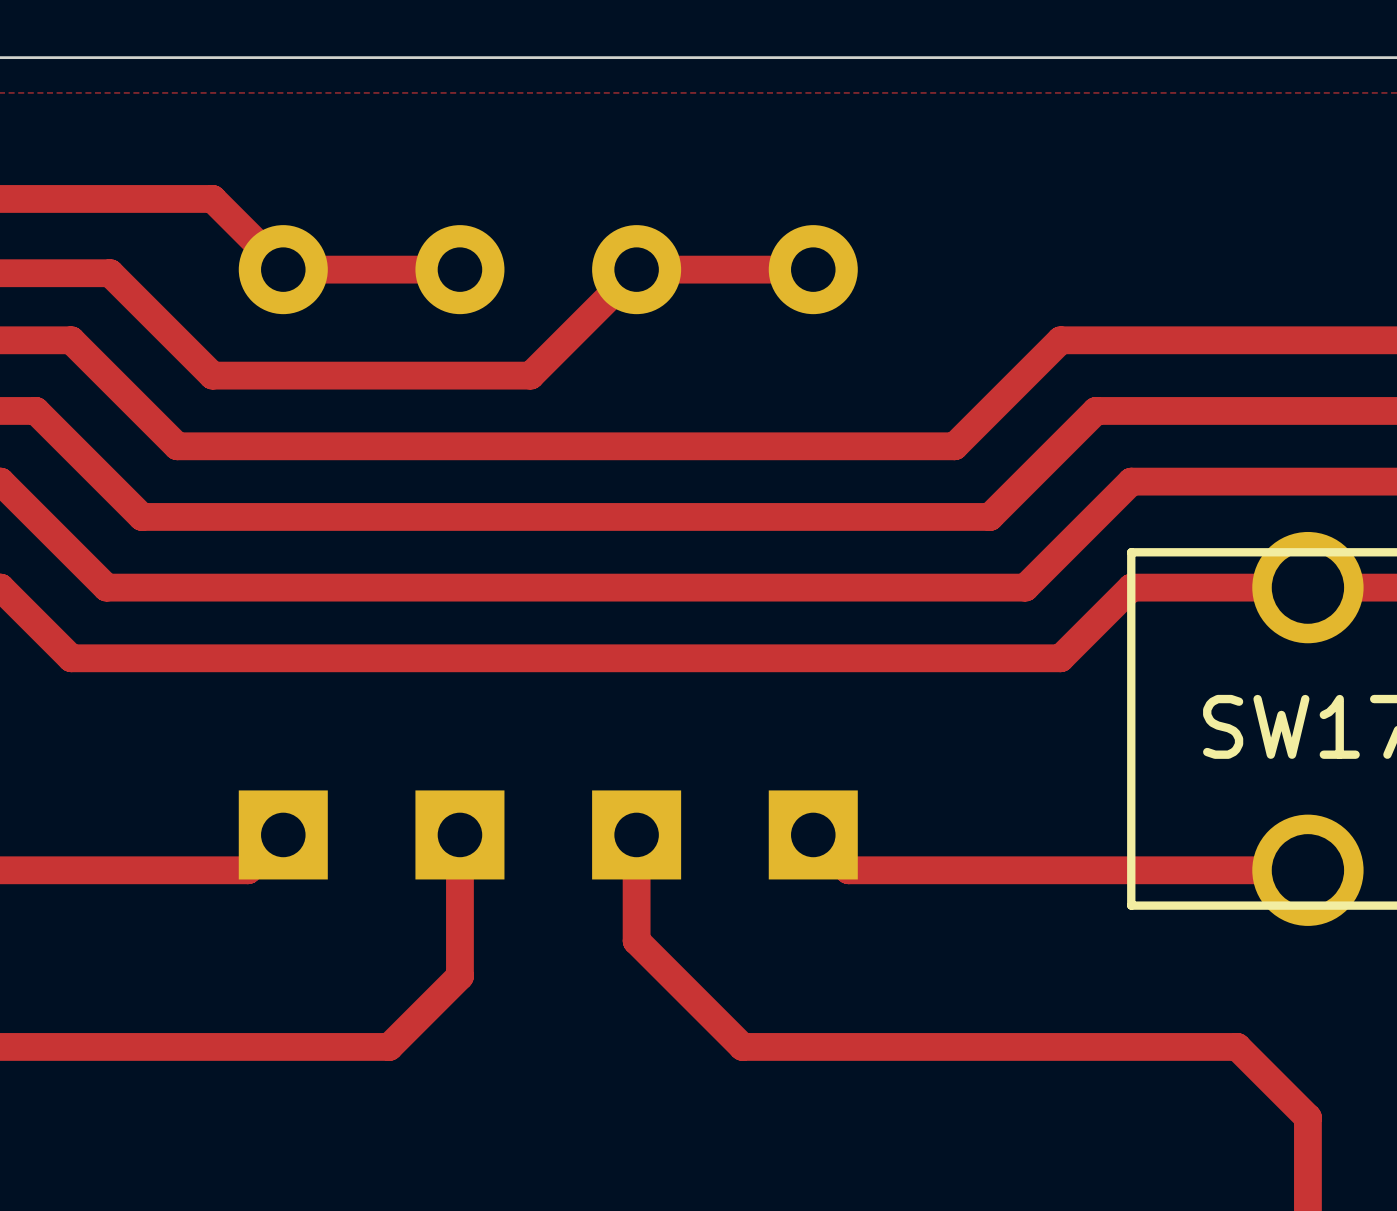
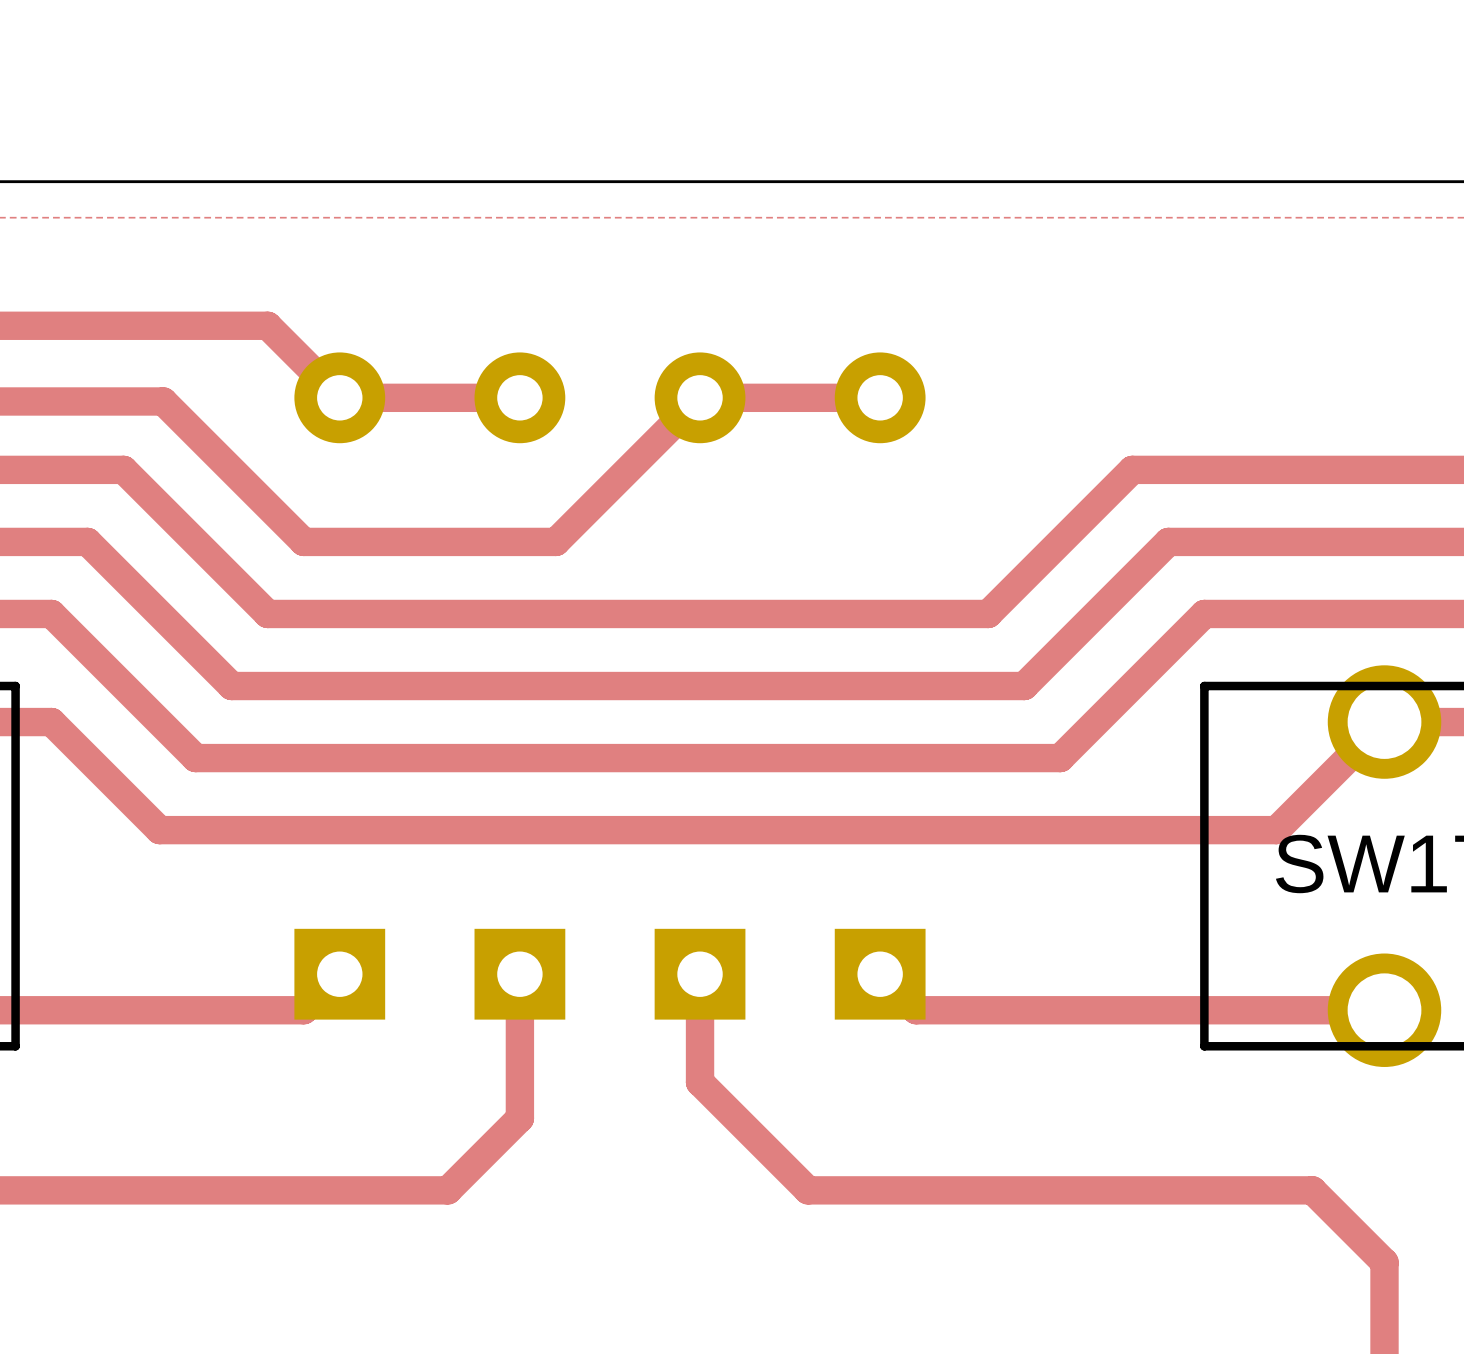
track: (212, 375) (530, 375) -> (267, 505) (303, 541) (555, 541) (591, 505)
track: (177, 446) (954, 446) -> (231, 577) (267, 613) (988, 613) (1024, 577)
track: (141, 516) (989, 516) -> (195, 650) (231, 686) (1024, 686) (1060, 650)
track: (106, 587) (1025, 587) -> (159, 722) (195, 758) (1060, 758) (1096, 722)
track: (1307, 587) (1131, 587) (1060, 658) (71, 658) -> (1384, 722) (1276, 830) (159, 830) (123, 794)

